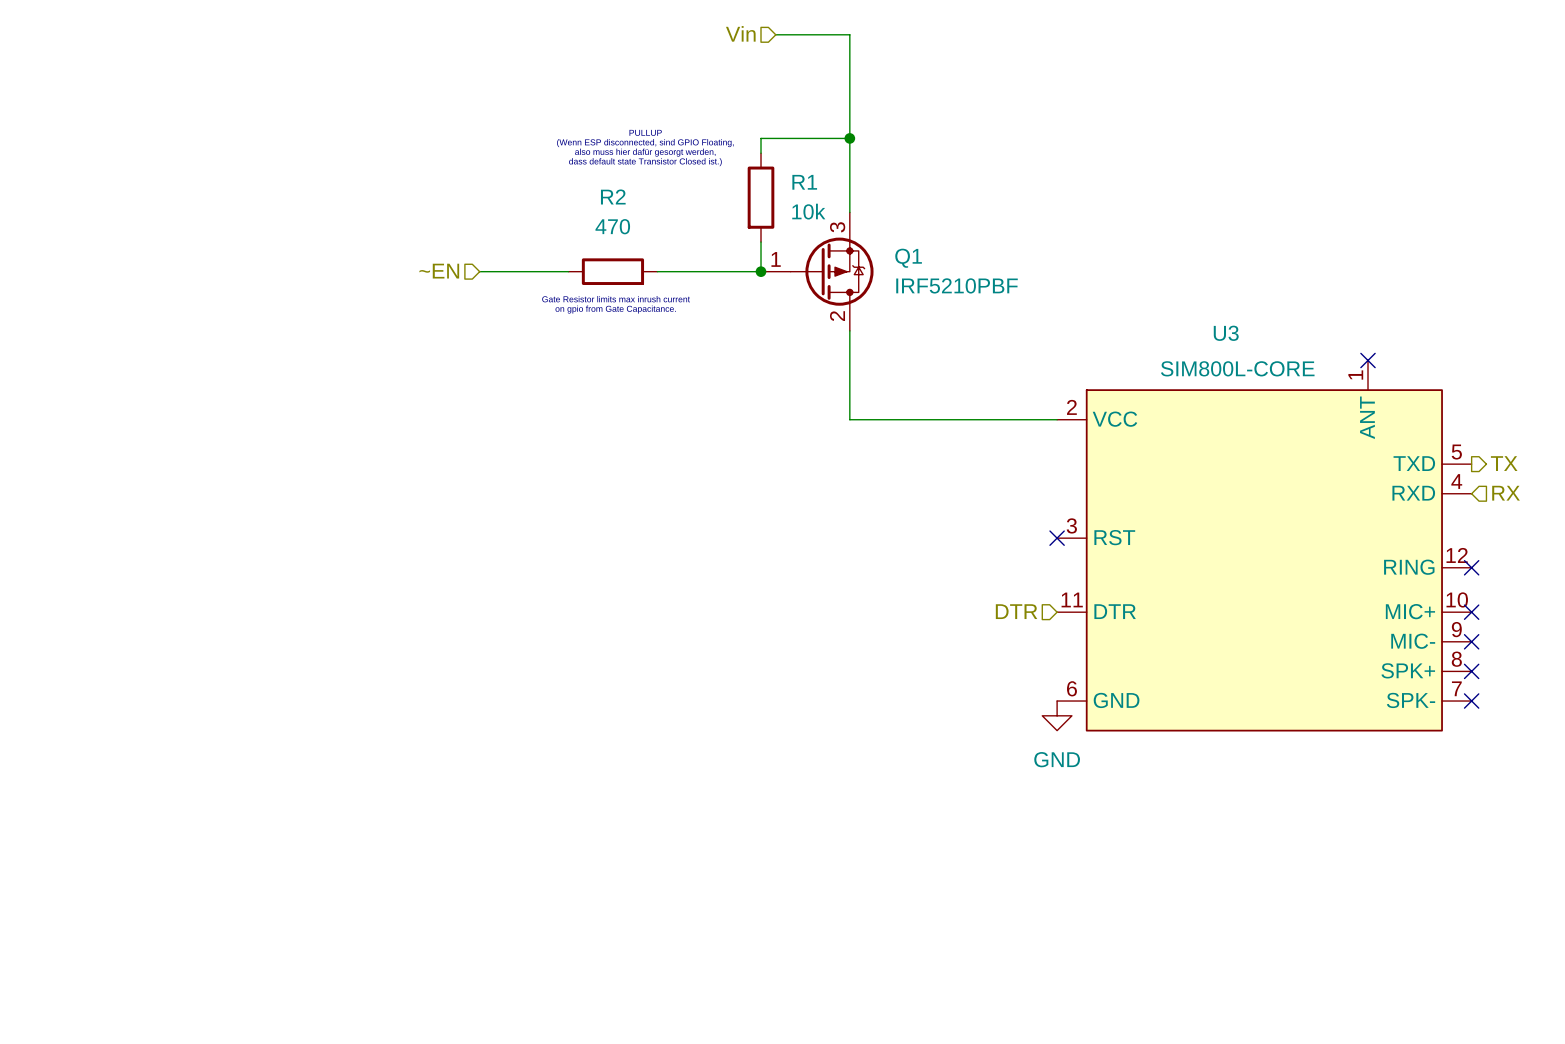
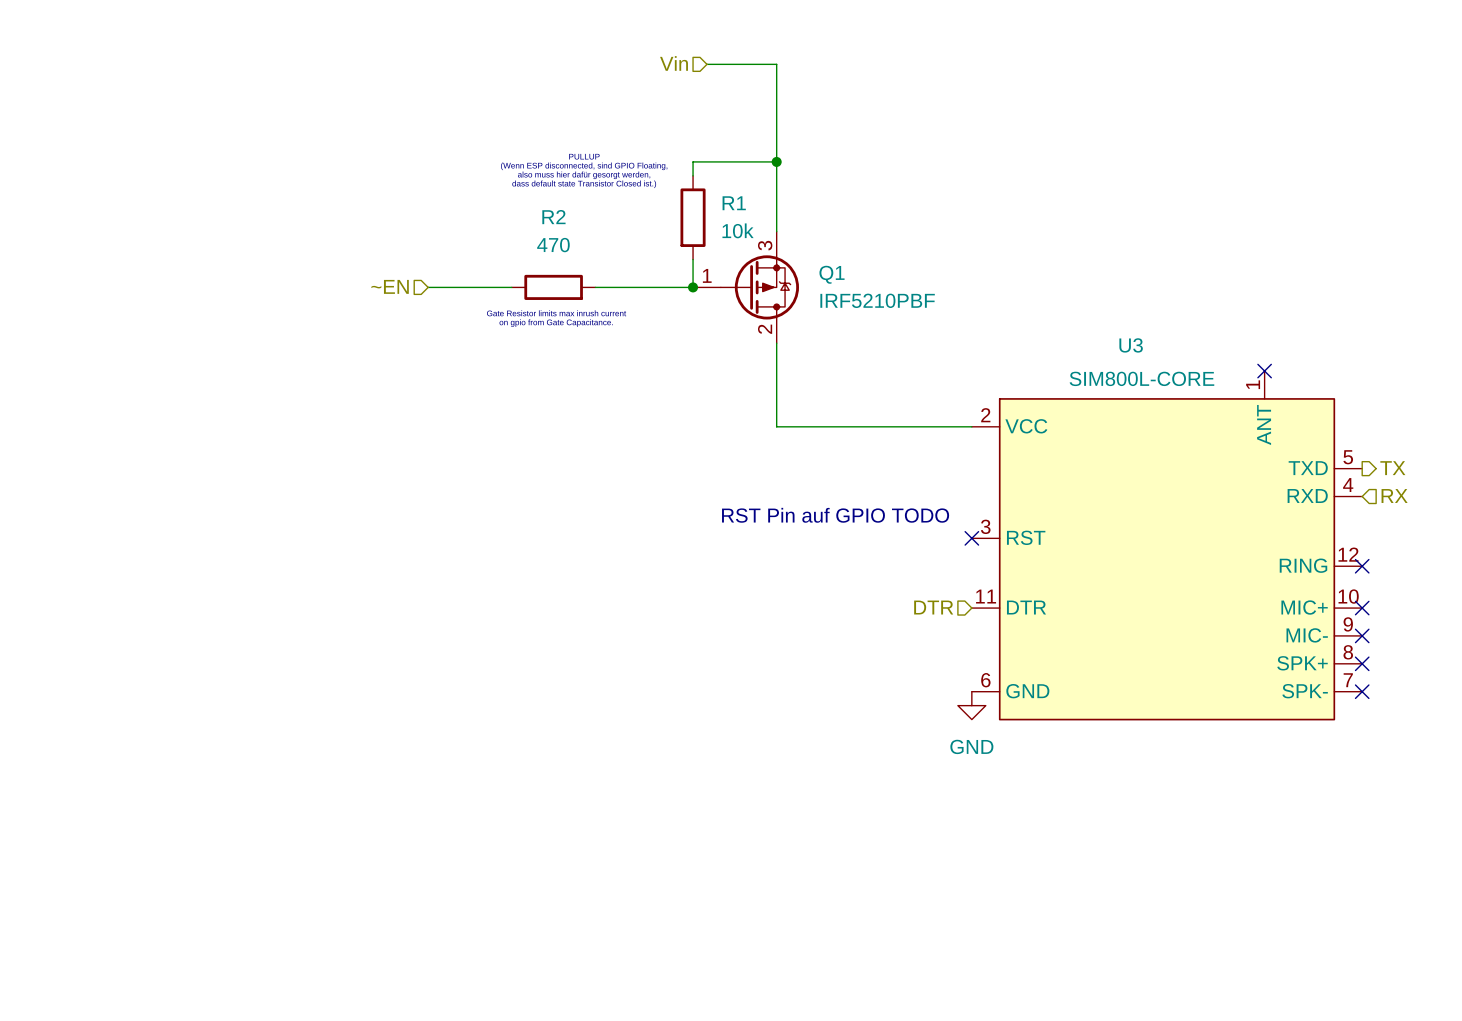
text: none -> RST Pin auf GPIO TODO (835, 515)

